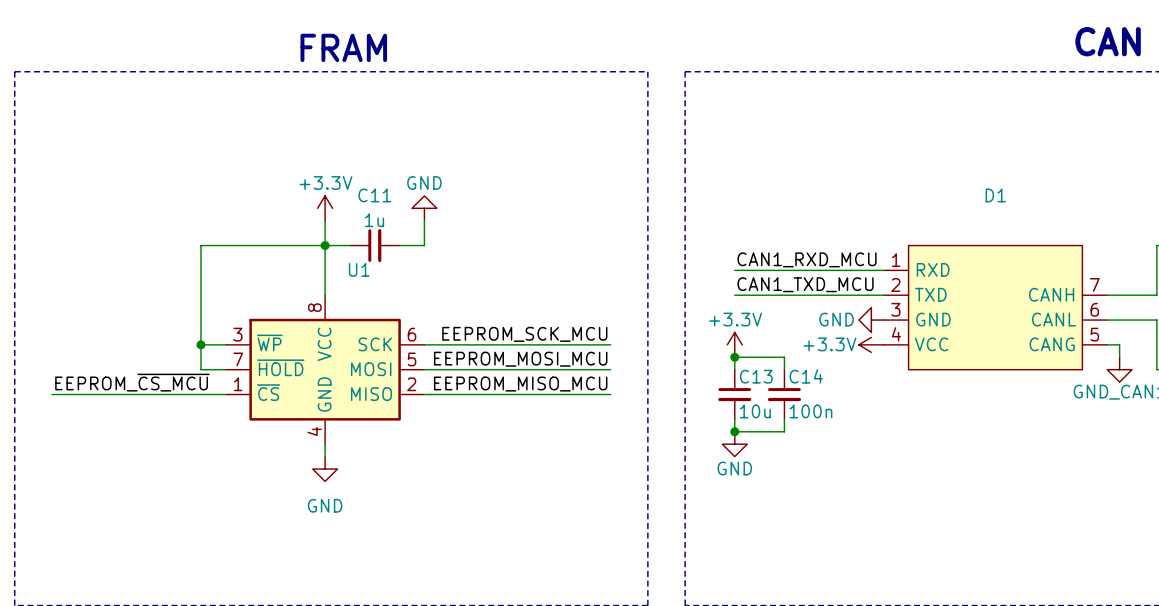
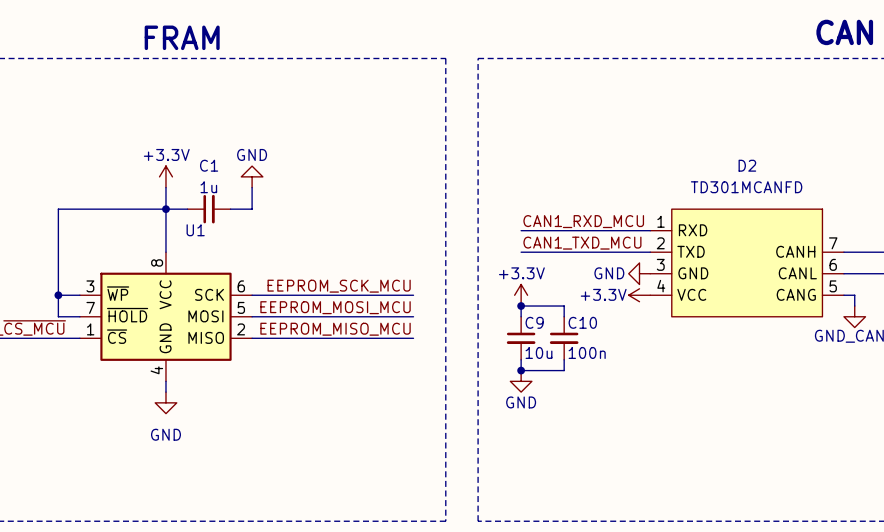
C11 name: C11 (374, 195) -> C1 (209, 165)
D1 name: D1 (995, 195) -> D2 (747, 165)
D1 value: none -> TD301MCANFD (746, 187)
C13 name: C13 (756, 376) -> C9 (534, 322)
C14 name: C14 (806, 376) -> C10 (582, 322)

